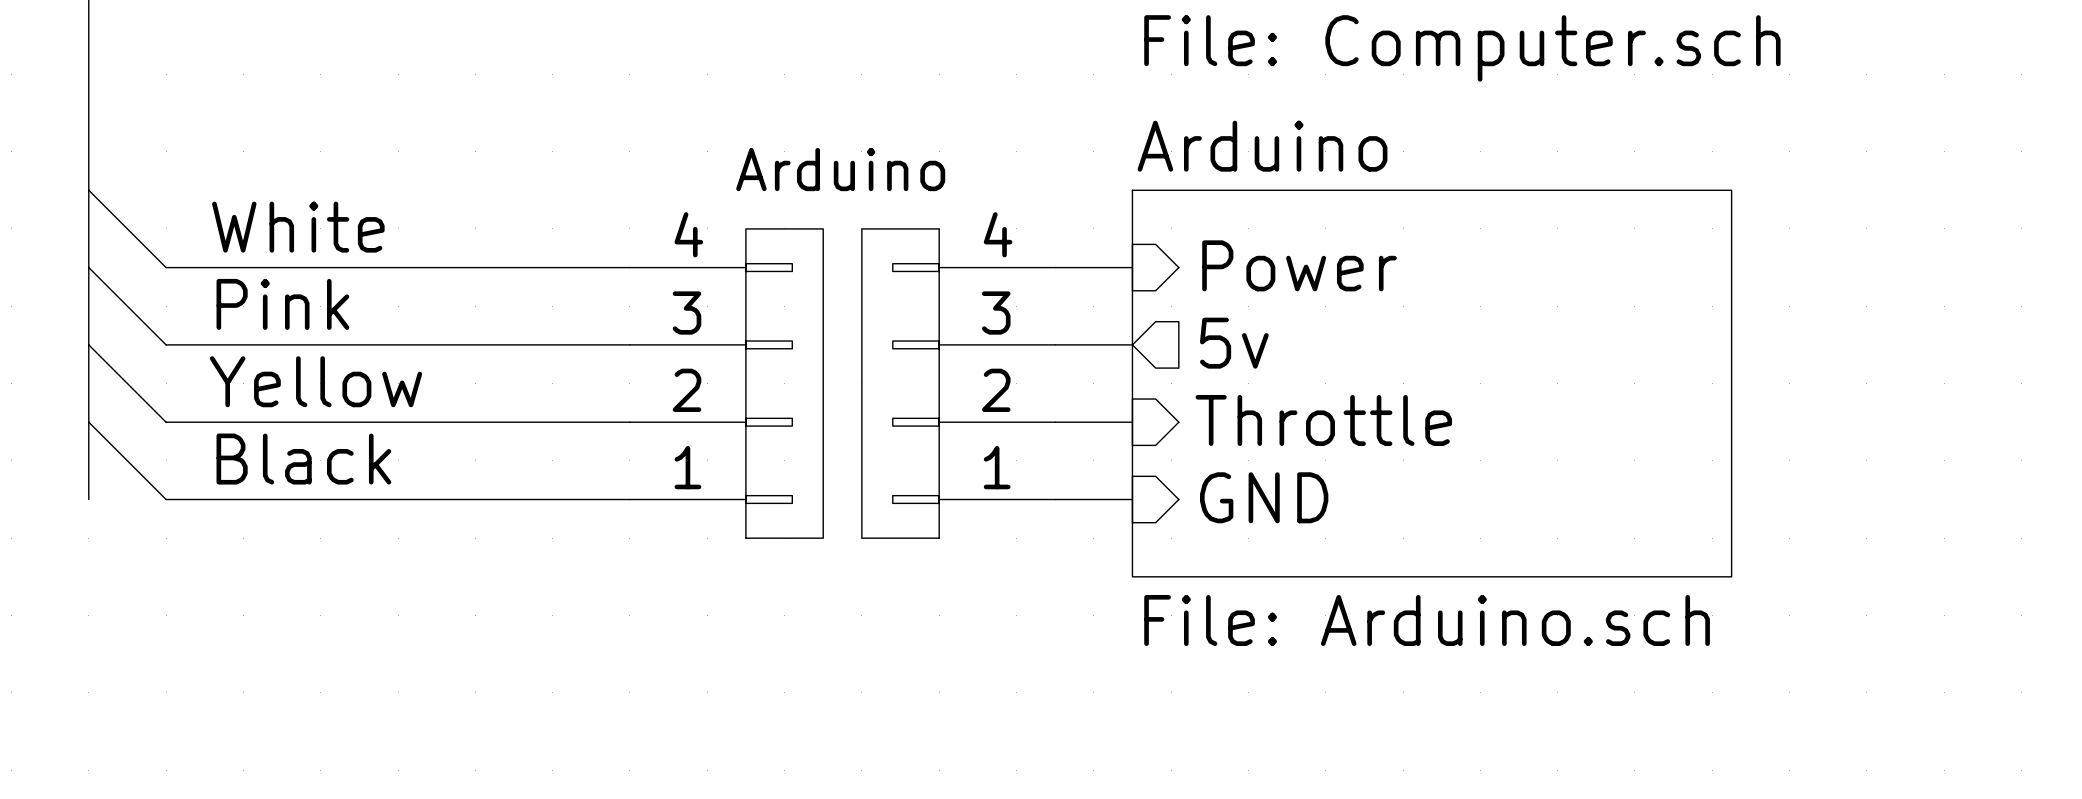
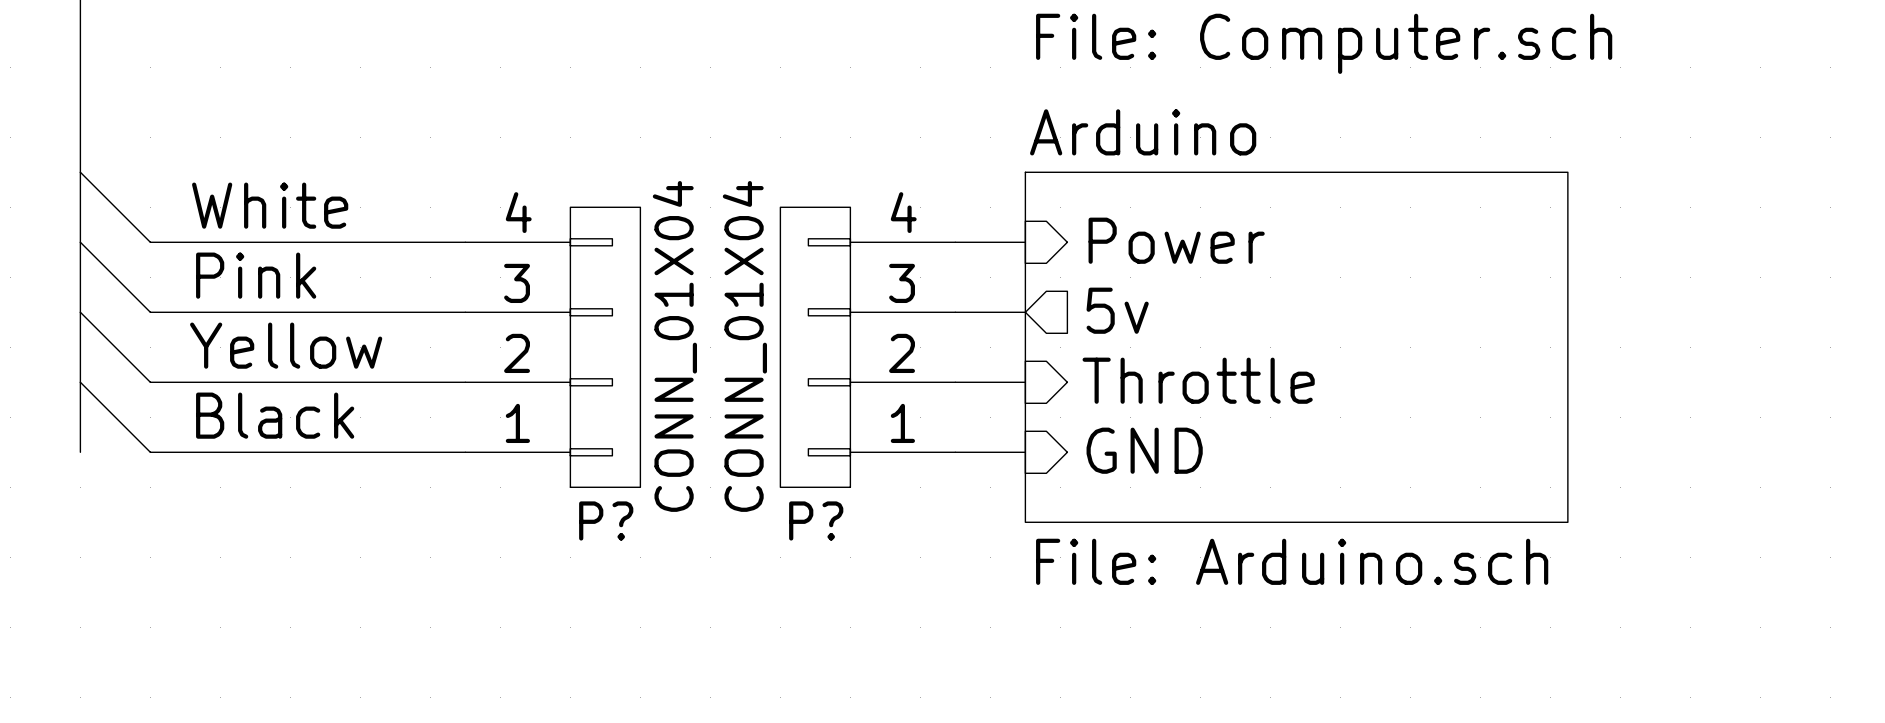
P? value: none -> CONN_01X04 (744, 346)
P?: none -> CONN_01X04 (552, 347)
part: Arduino (726, 383) -> none
P? name: none -> P? (816, 520)

